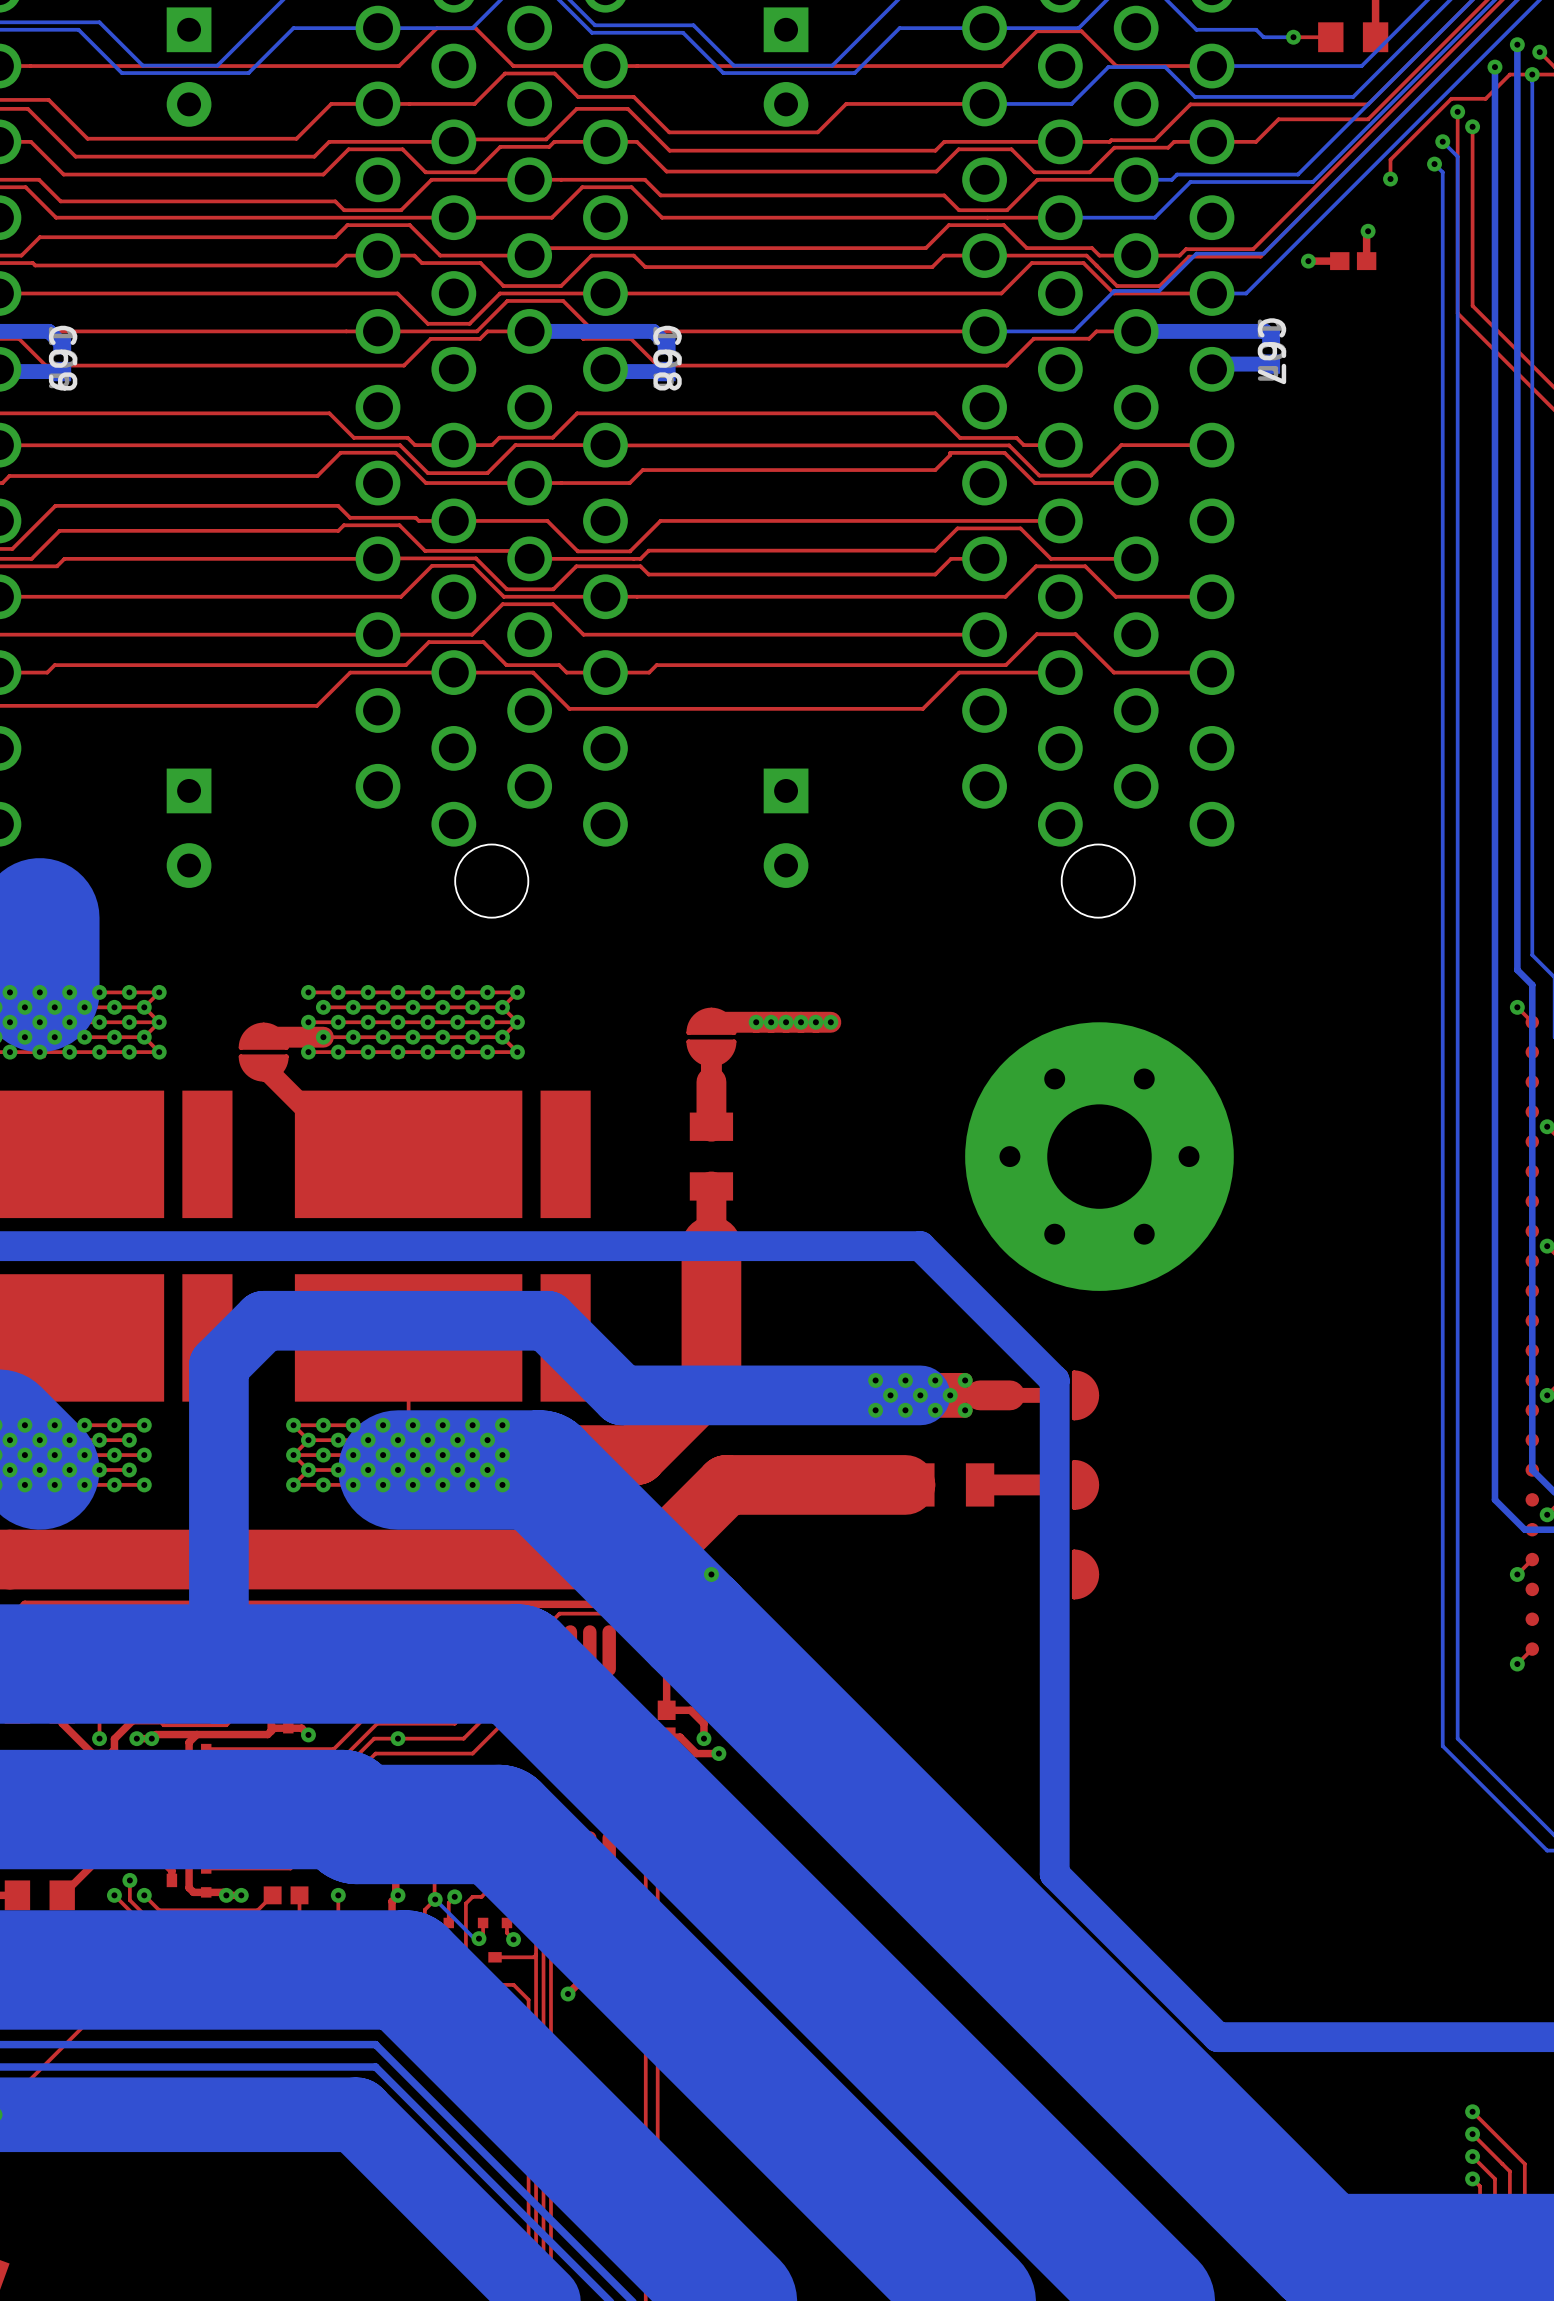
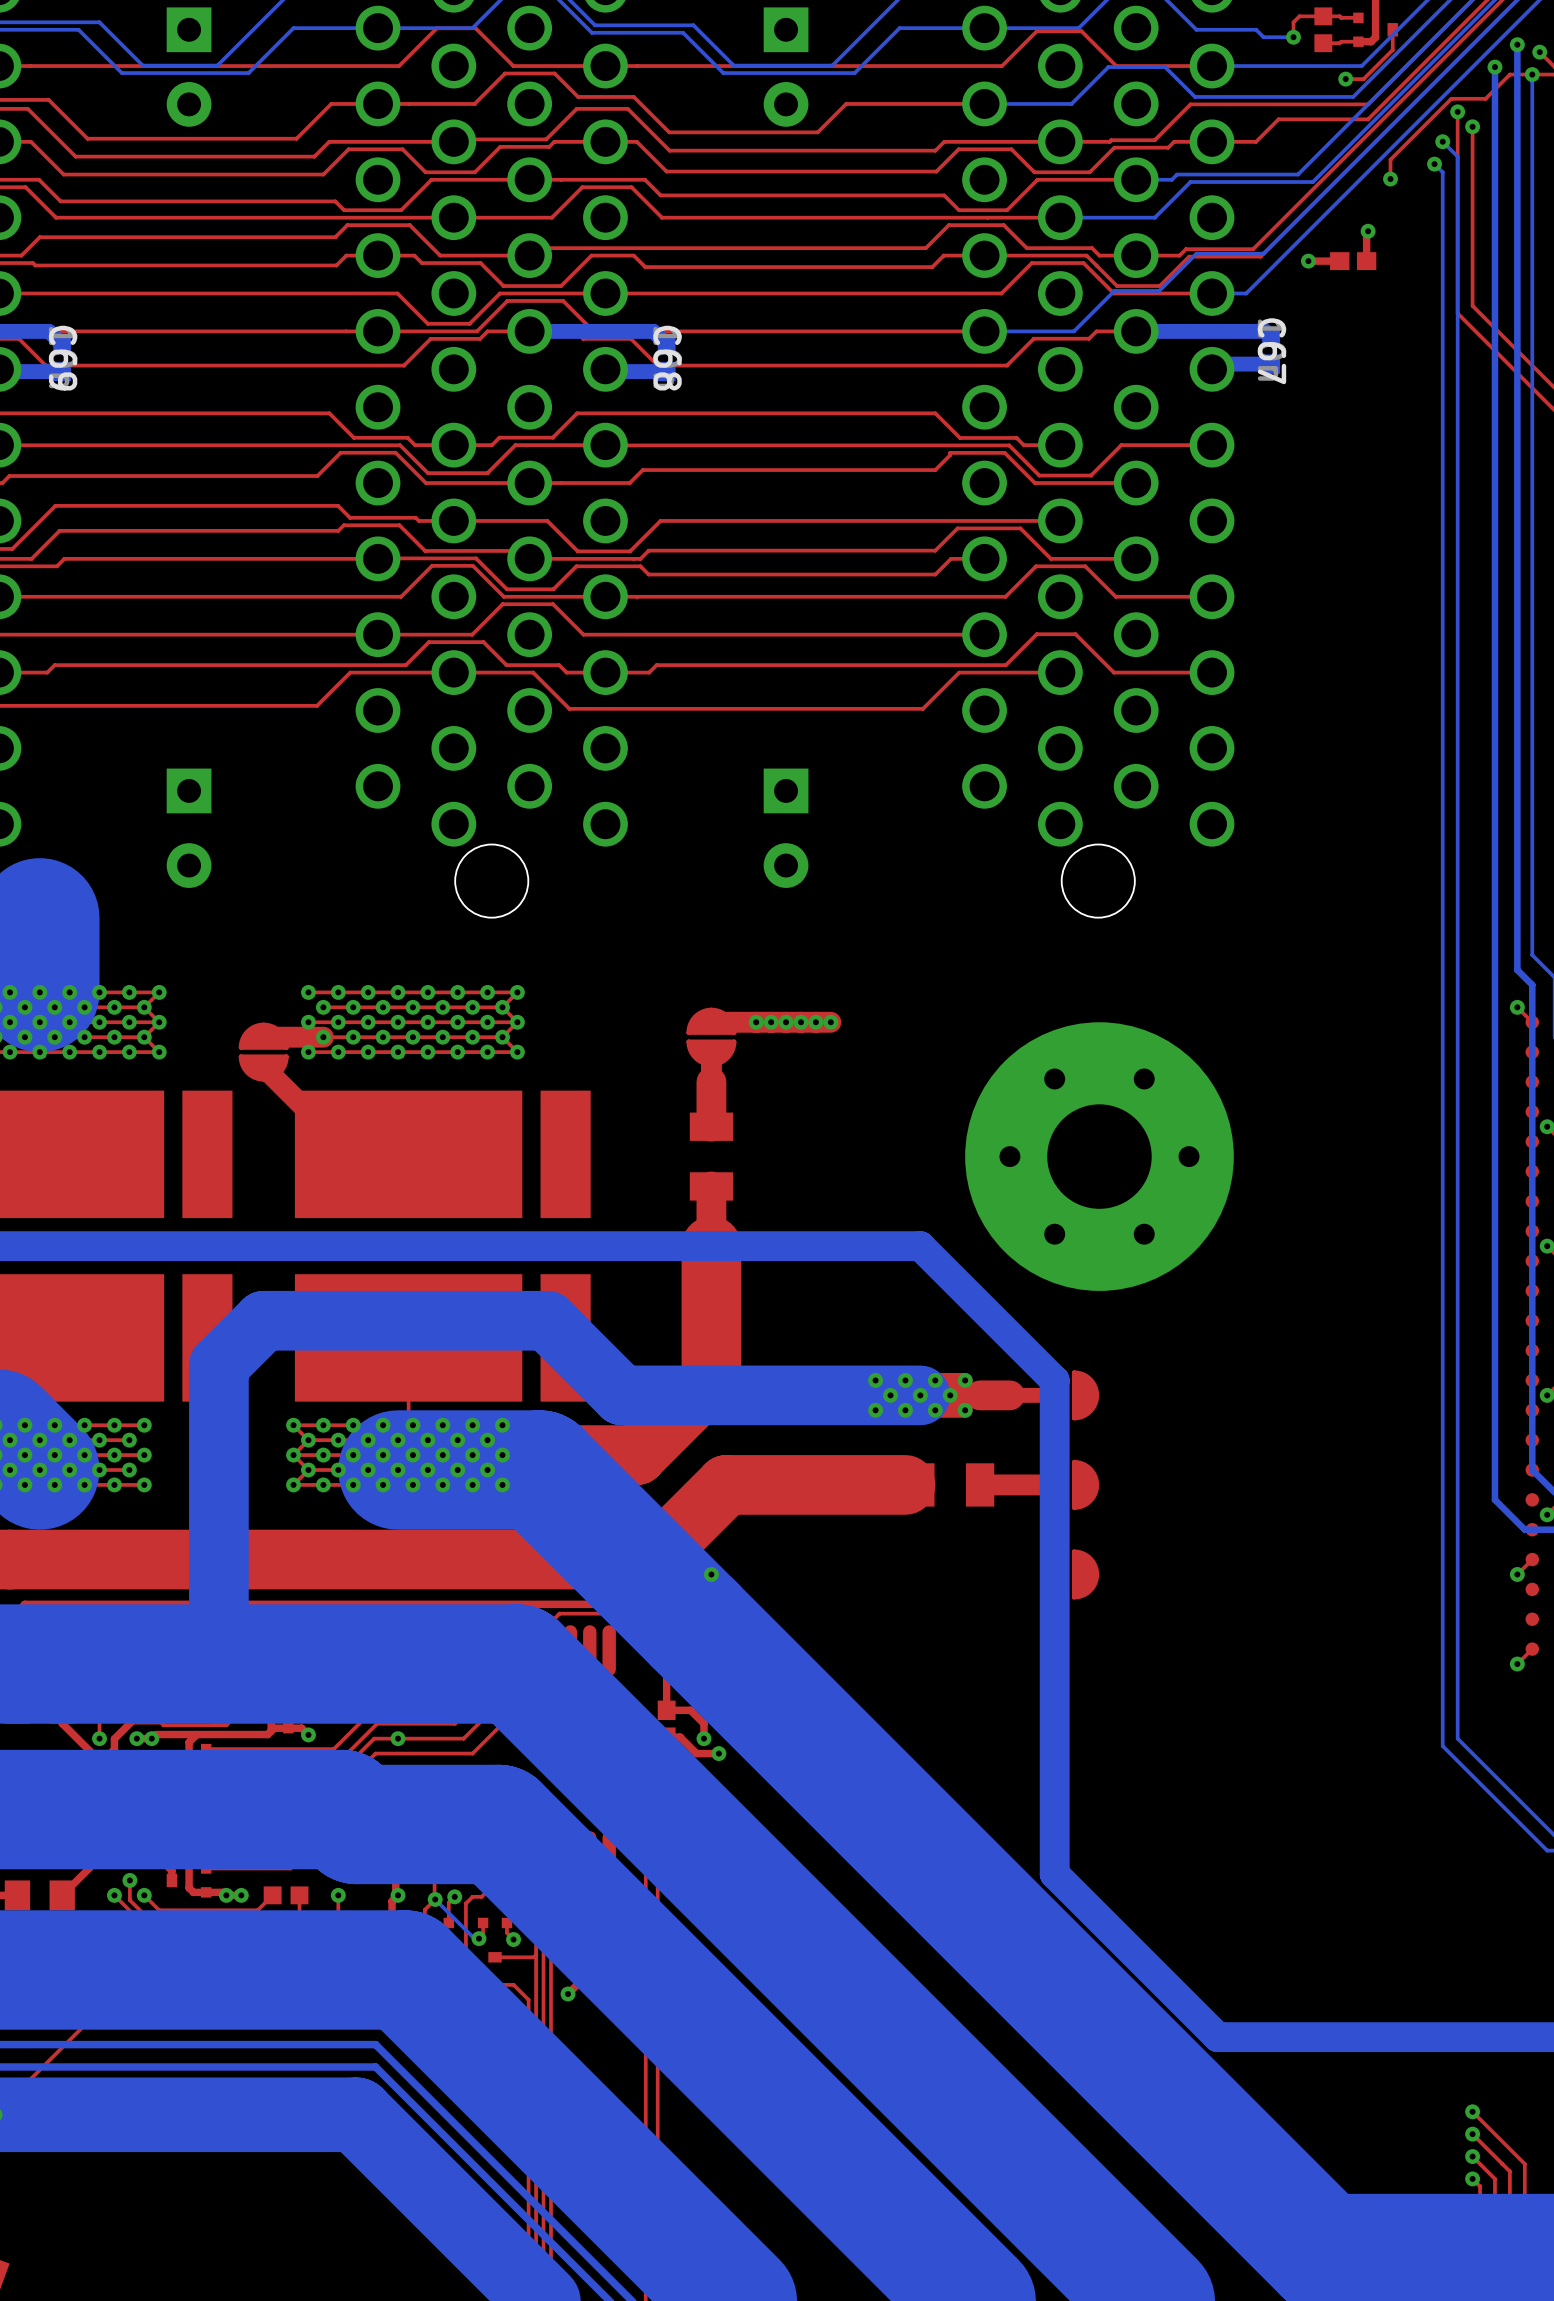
part: none -> (1323, 29)
part: none -> (1375, 29)
top track: none -> (1392, 29) (1392, 49) (1363, 79) (1345, 79)
top track: (1330, 37) (1293, 37) -> (1358, 17) (1299, 16) (1293, 22) (1293, 37)
part: (1353, 37) -> none
top track: none -> (1375, 37) (1371, 41) (1323, 43)
via: none -> (1345, 79)

